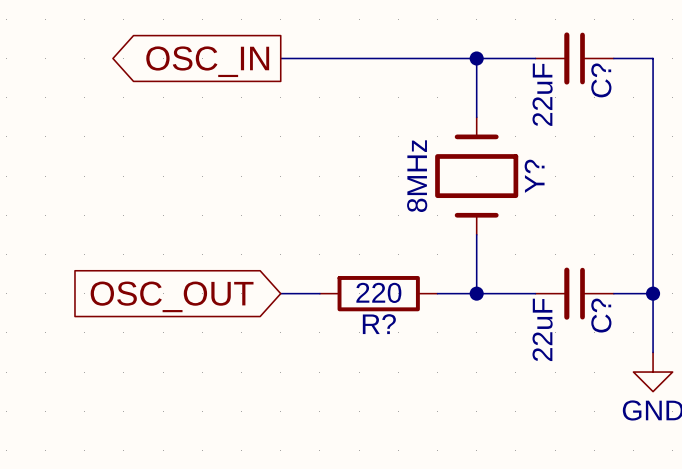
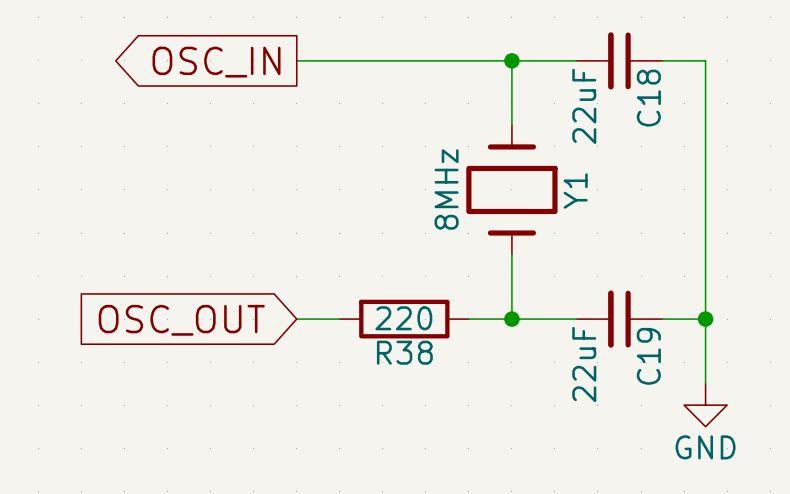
C? name: C? (601, 80) -> C18 (648, 98)
Y? name: Y? (534, 176) -> Y1 (575, 191)
C? name: C? (601, 315) -> C19 (648, 356)
R? name: R? (379, 324) -> R38 (404, 352)

